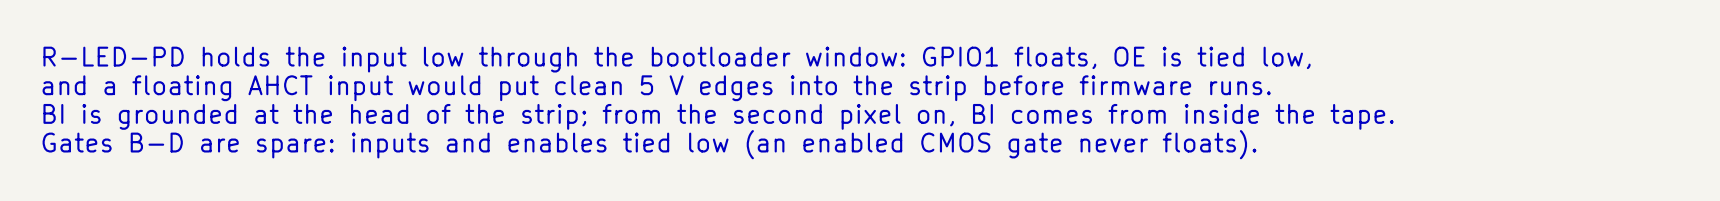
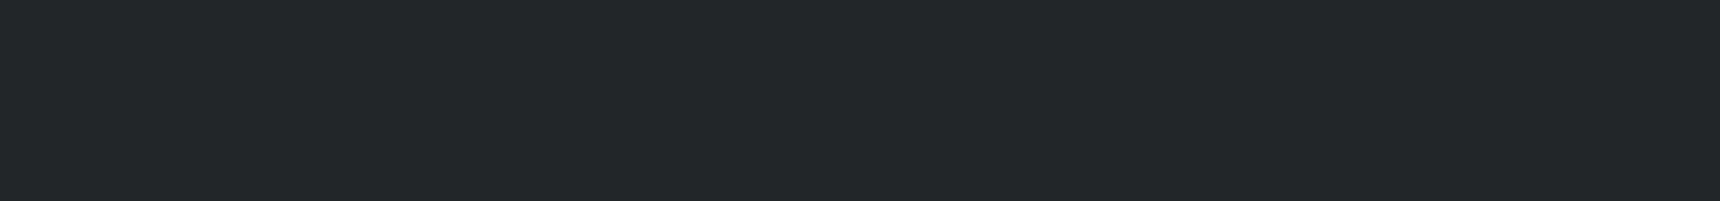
text: R-LED-PD holds the input low through the bootloader window: GPIO1 floats, OE is tied low, (677, 59) -> none
text: and a floating AHCT input would put clean 5 V edges into the strip before firmware runs. (656, 88) -> none
text: BI is grounded at the head of the strip; from the second pixel on, BI comes from inside the tape. (718, 116) -> none
text: Gates B-D are spare: inputs and enables tied low (an enabled CMOS gate never floats). (649, 144) -> none

